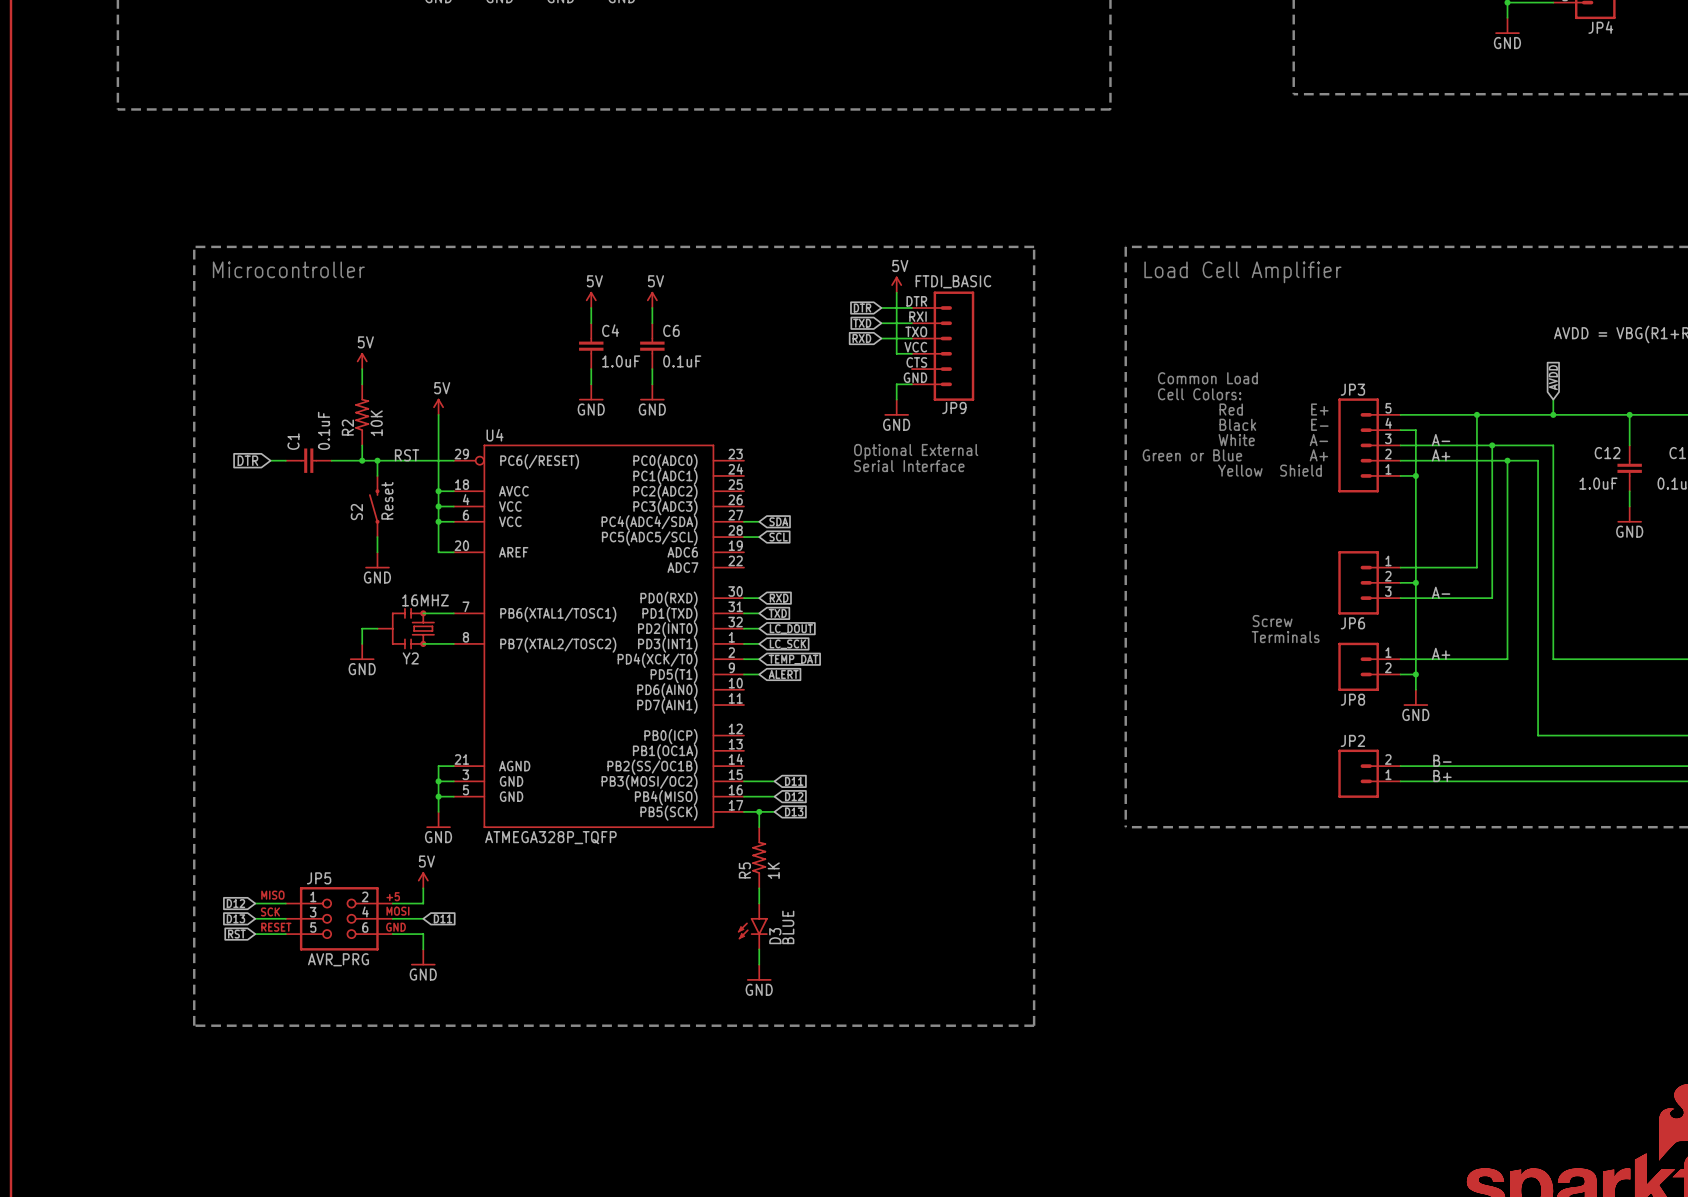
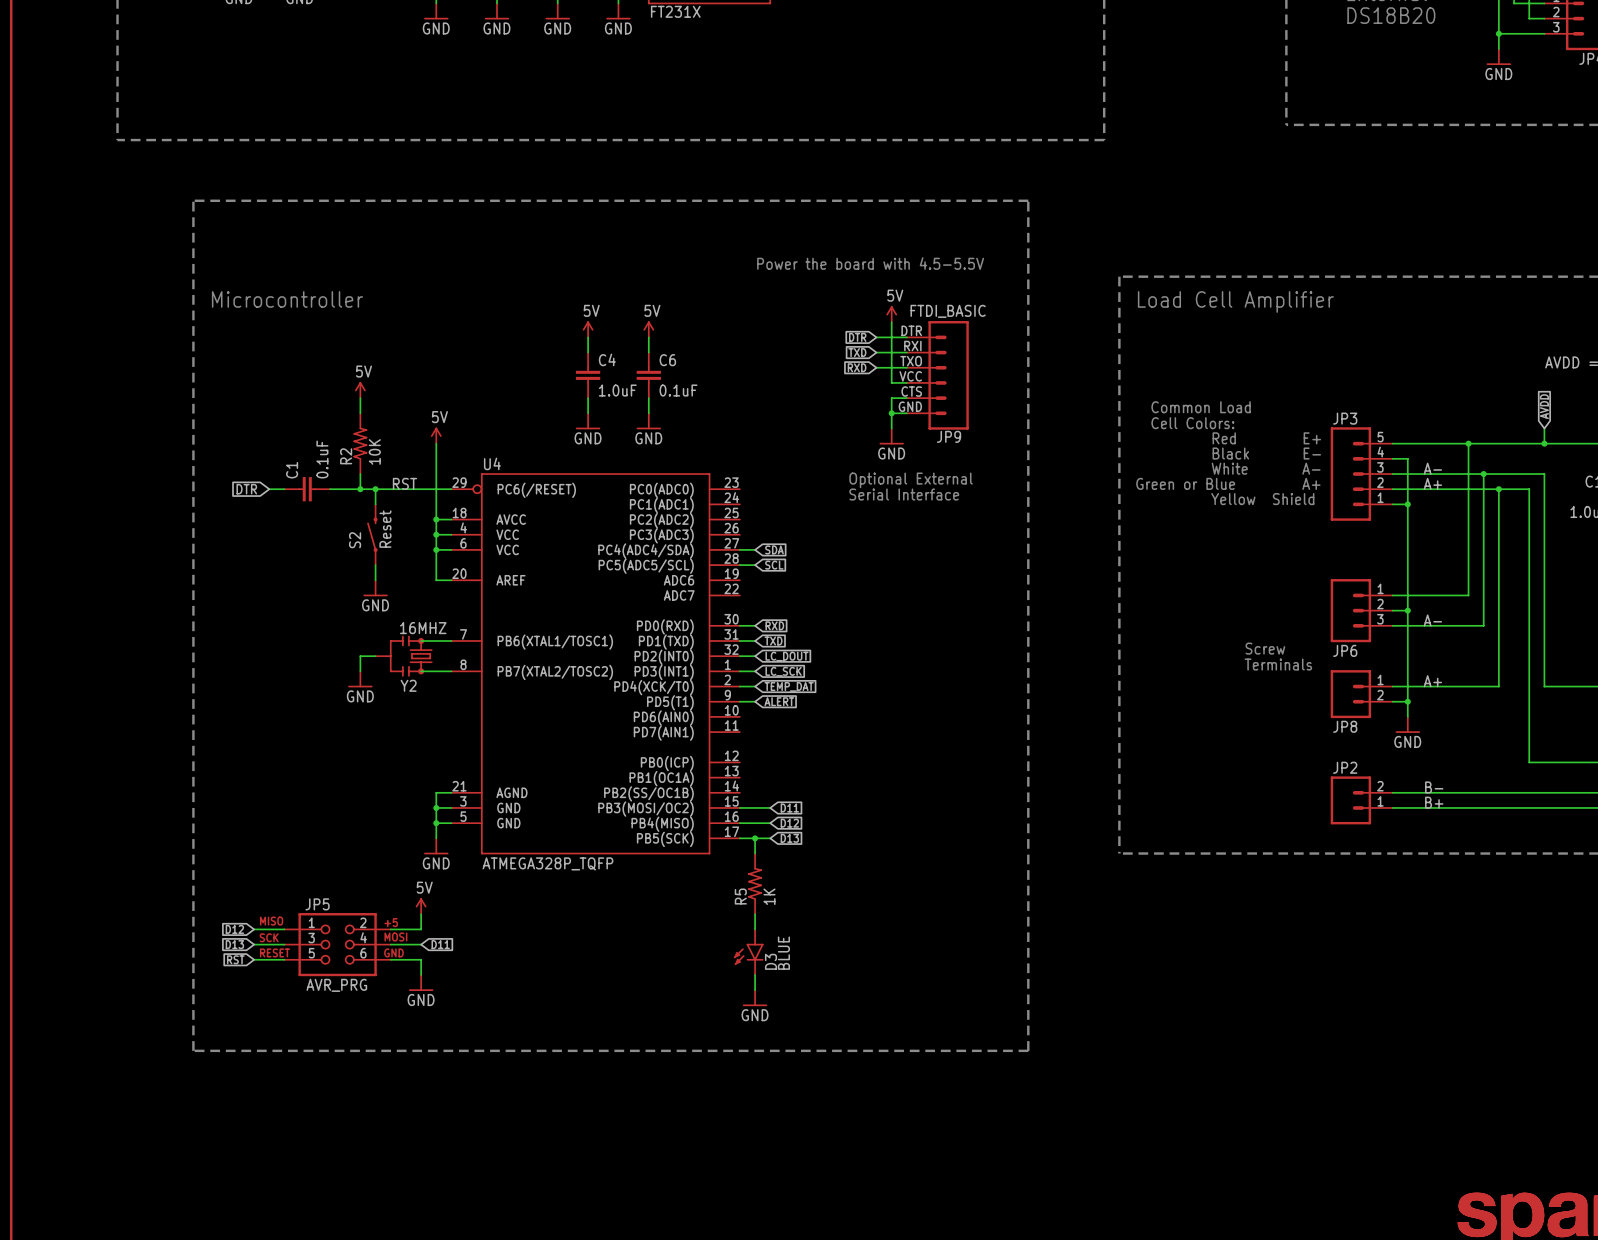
text: none -> Power the board with 4.5-5.5V (870, 263)
line: (194, 246) (1034, 246) -> (193, 276) (193, 200) (1028, 200) (1028, 276)
wire: none -> (906, 398) (891, 398) (891, 413)
junction: none -> (891, 413)

